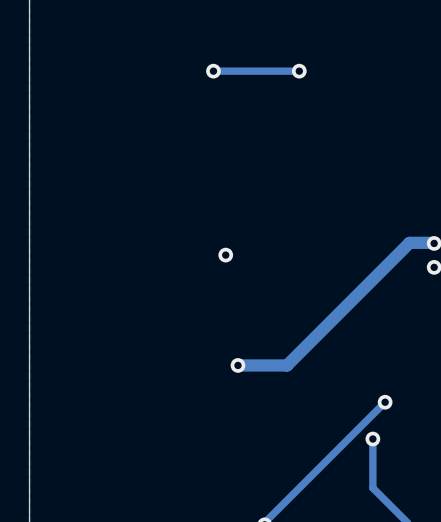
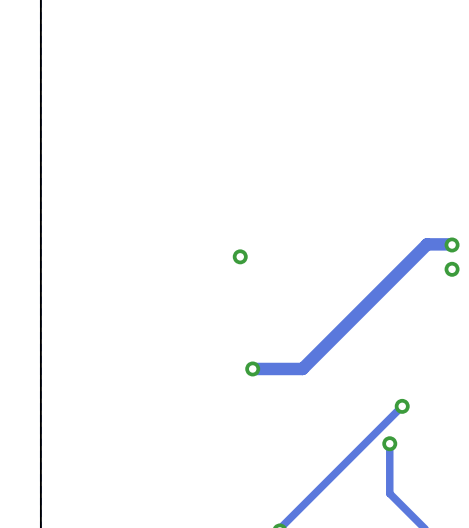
via: (213, 71) -> none
track: (299, 71) (213, 71) -> none
via: (299, 71) -> none

